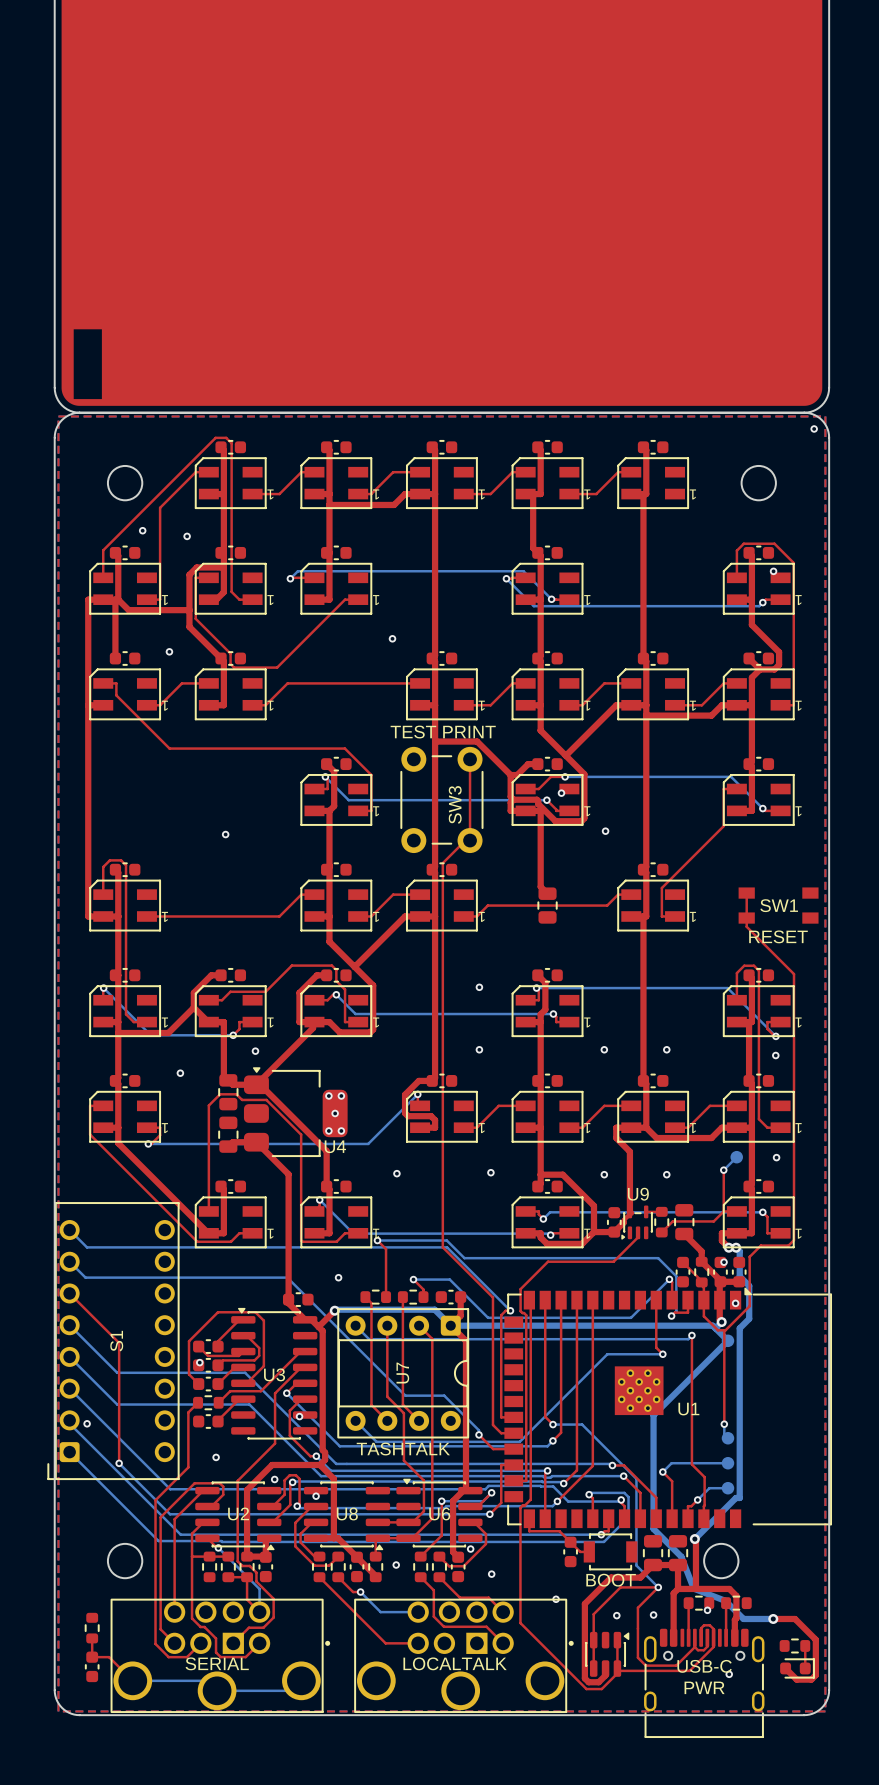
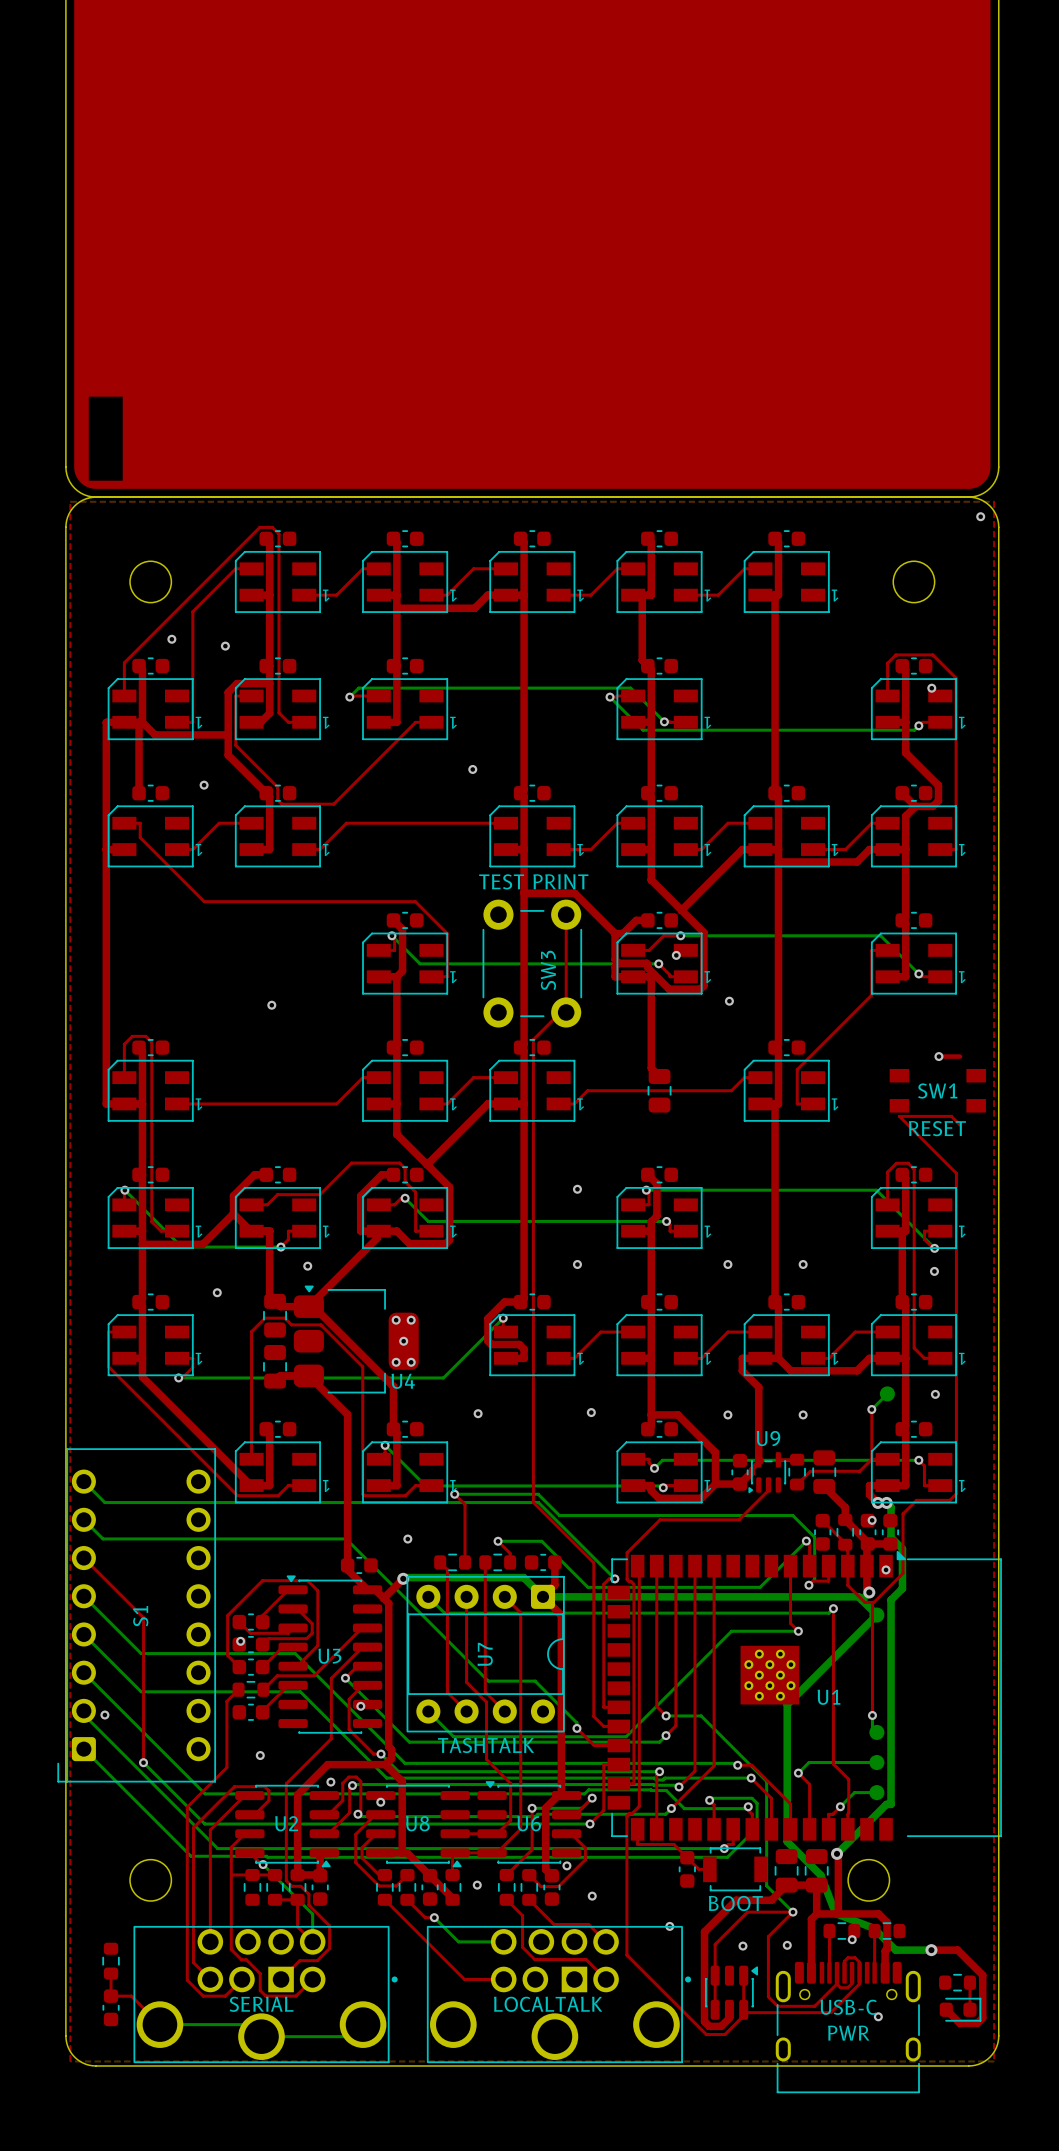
top track: none -> (938, 1056) (960, 1056)
via: none -> (938, 1056)
top track: (746, 893) (746, 926) -> (960, 1125) (951, 1116) (899, 1116)

